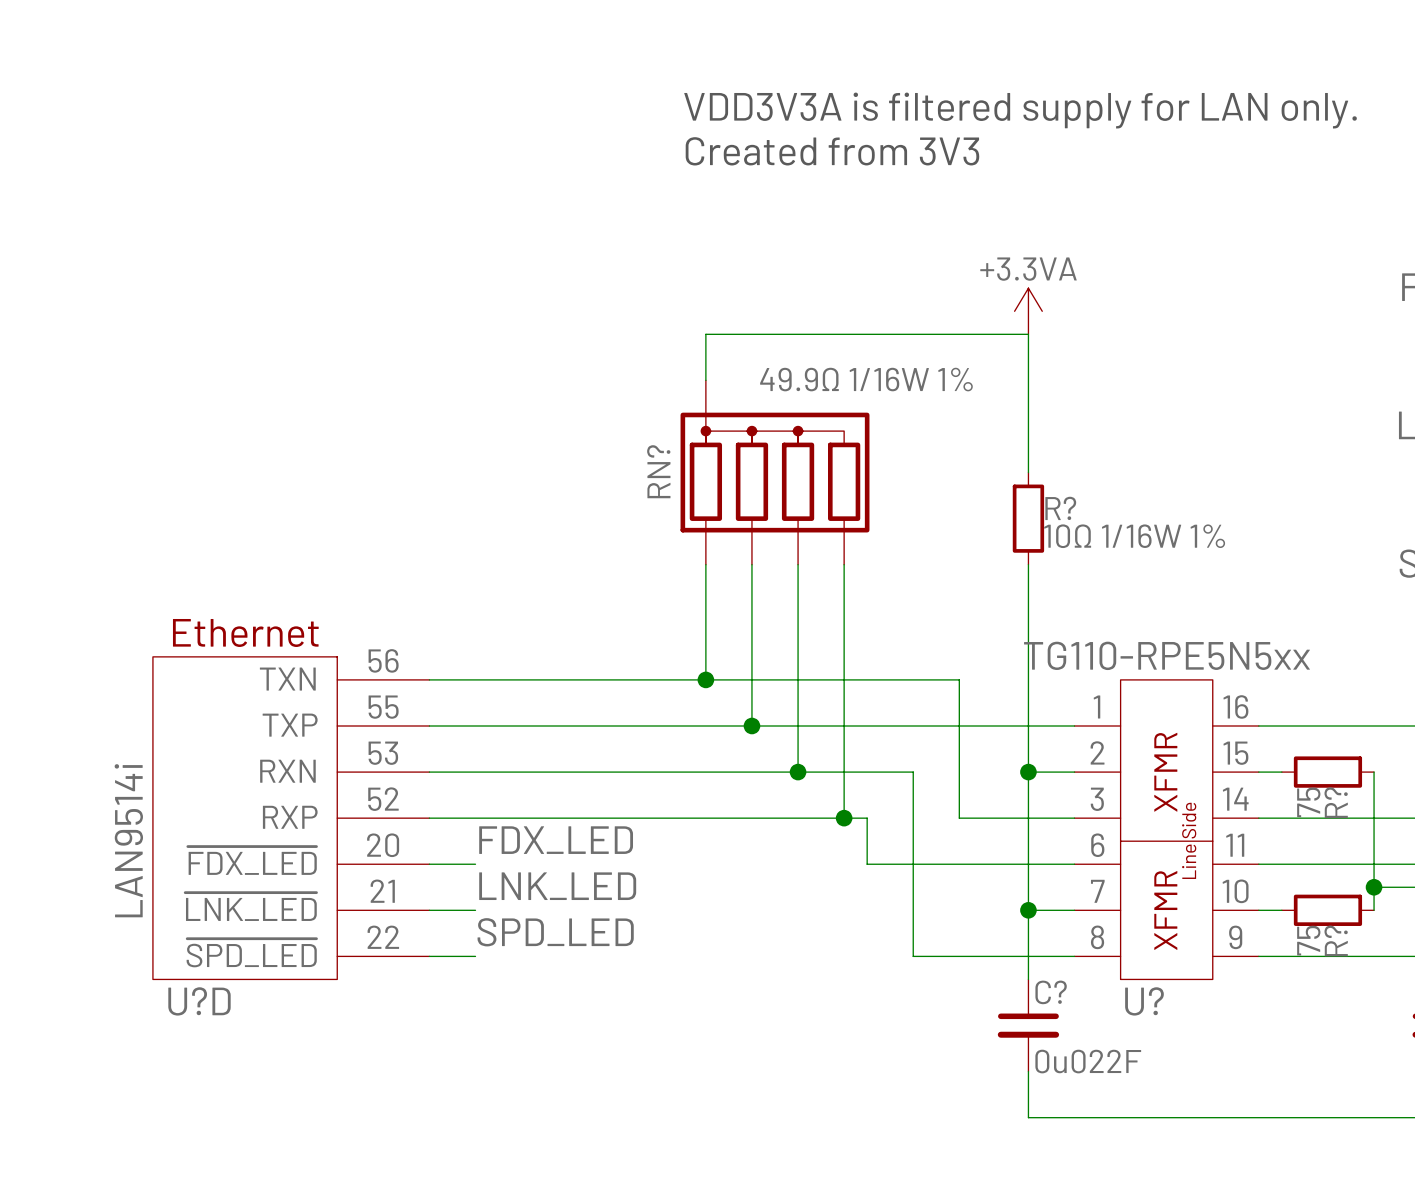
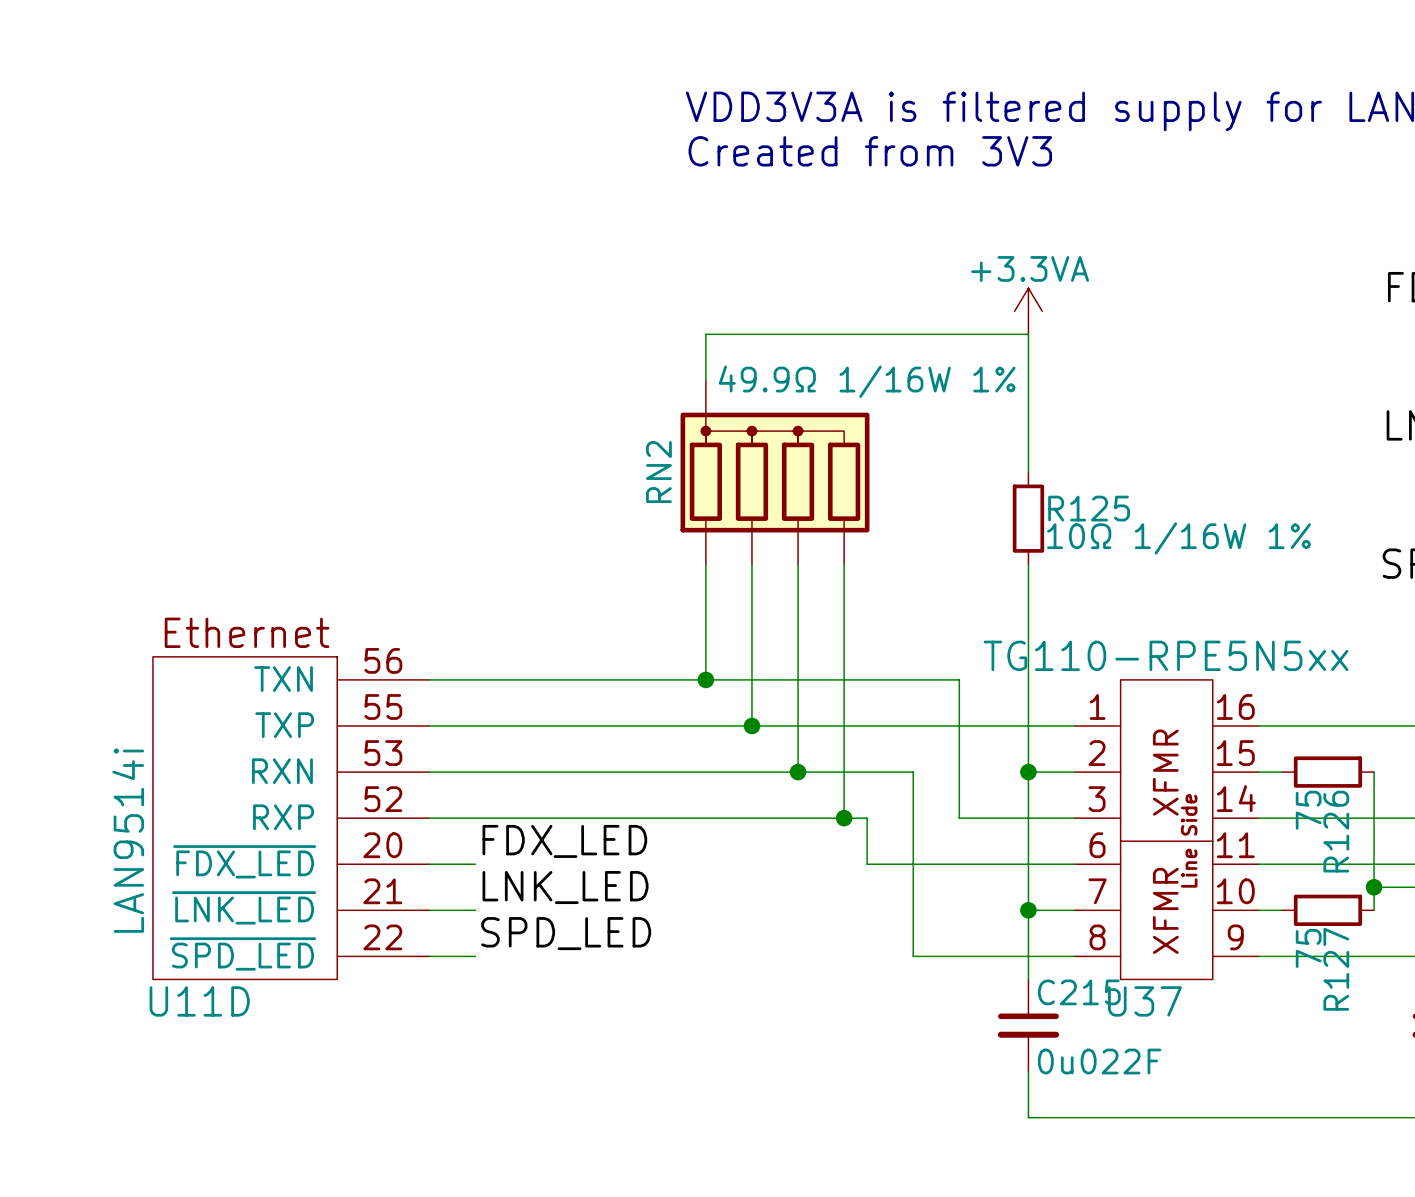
RN? name: RN? (658, 471) -> RN2 (658, 472)
R? name: R? (1060, 508) -> R125 (1089, 508)
R? name: R? (1336, 802) -> R126 (1336, 831)
R? name: R? (1336, 940) -> R127 (1336, 969)
C? name: C? (1051, 992) -> C215 (1079, 992)
U?D name: U?D (199, 1001) -> U11D (199, 1001)
U? name: U? (1144, 1001) -> U37 (1144, 1001)

